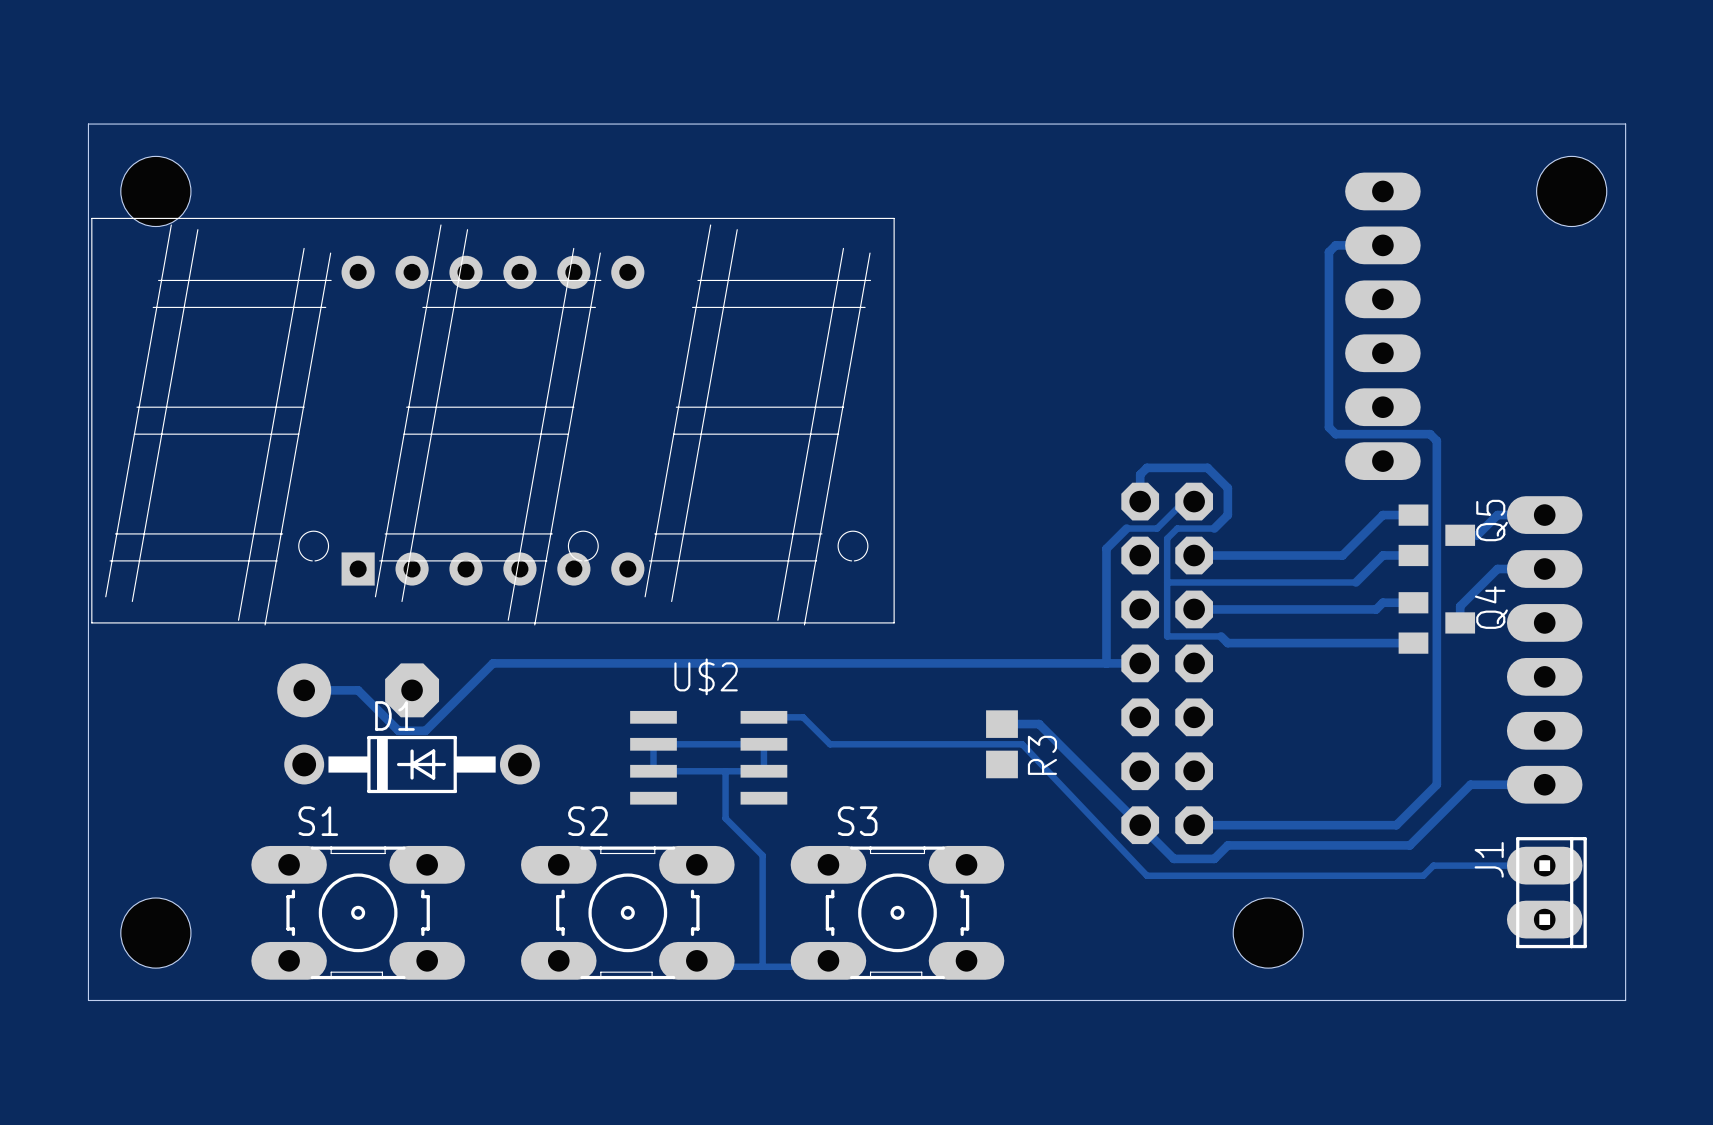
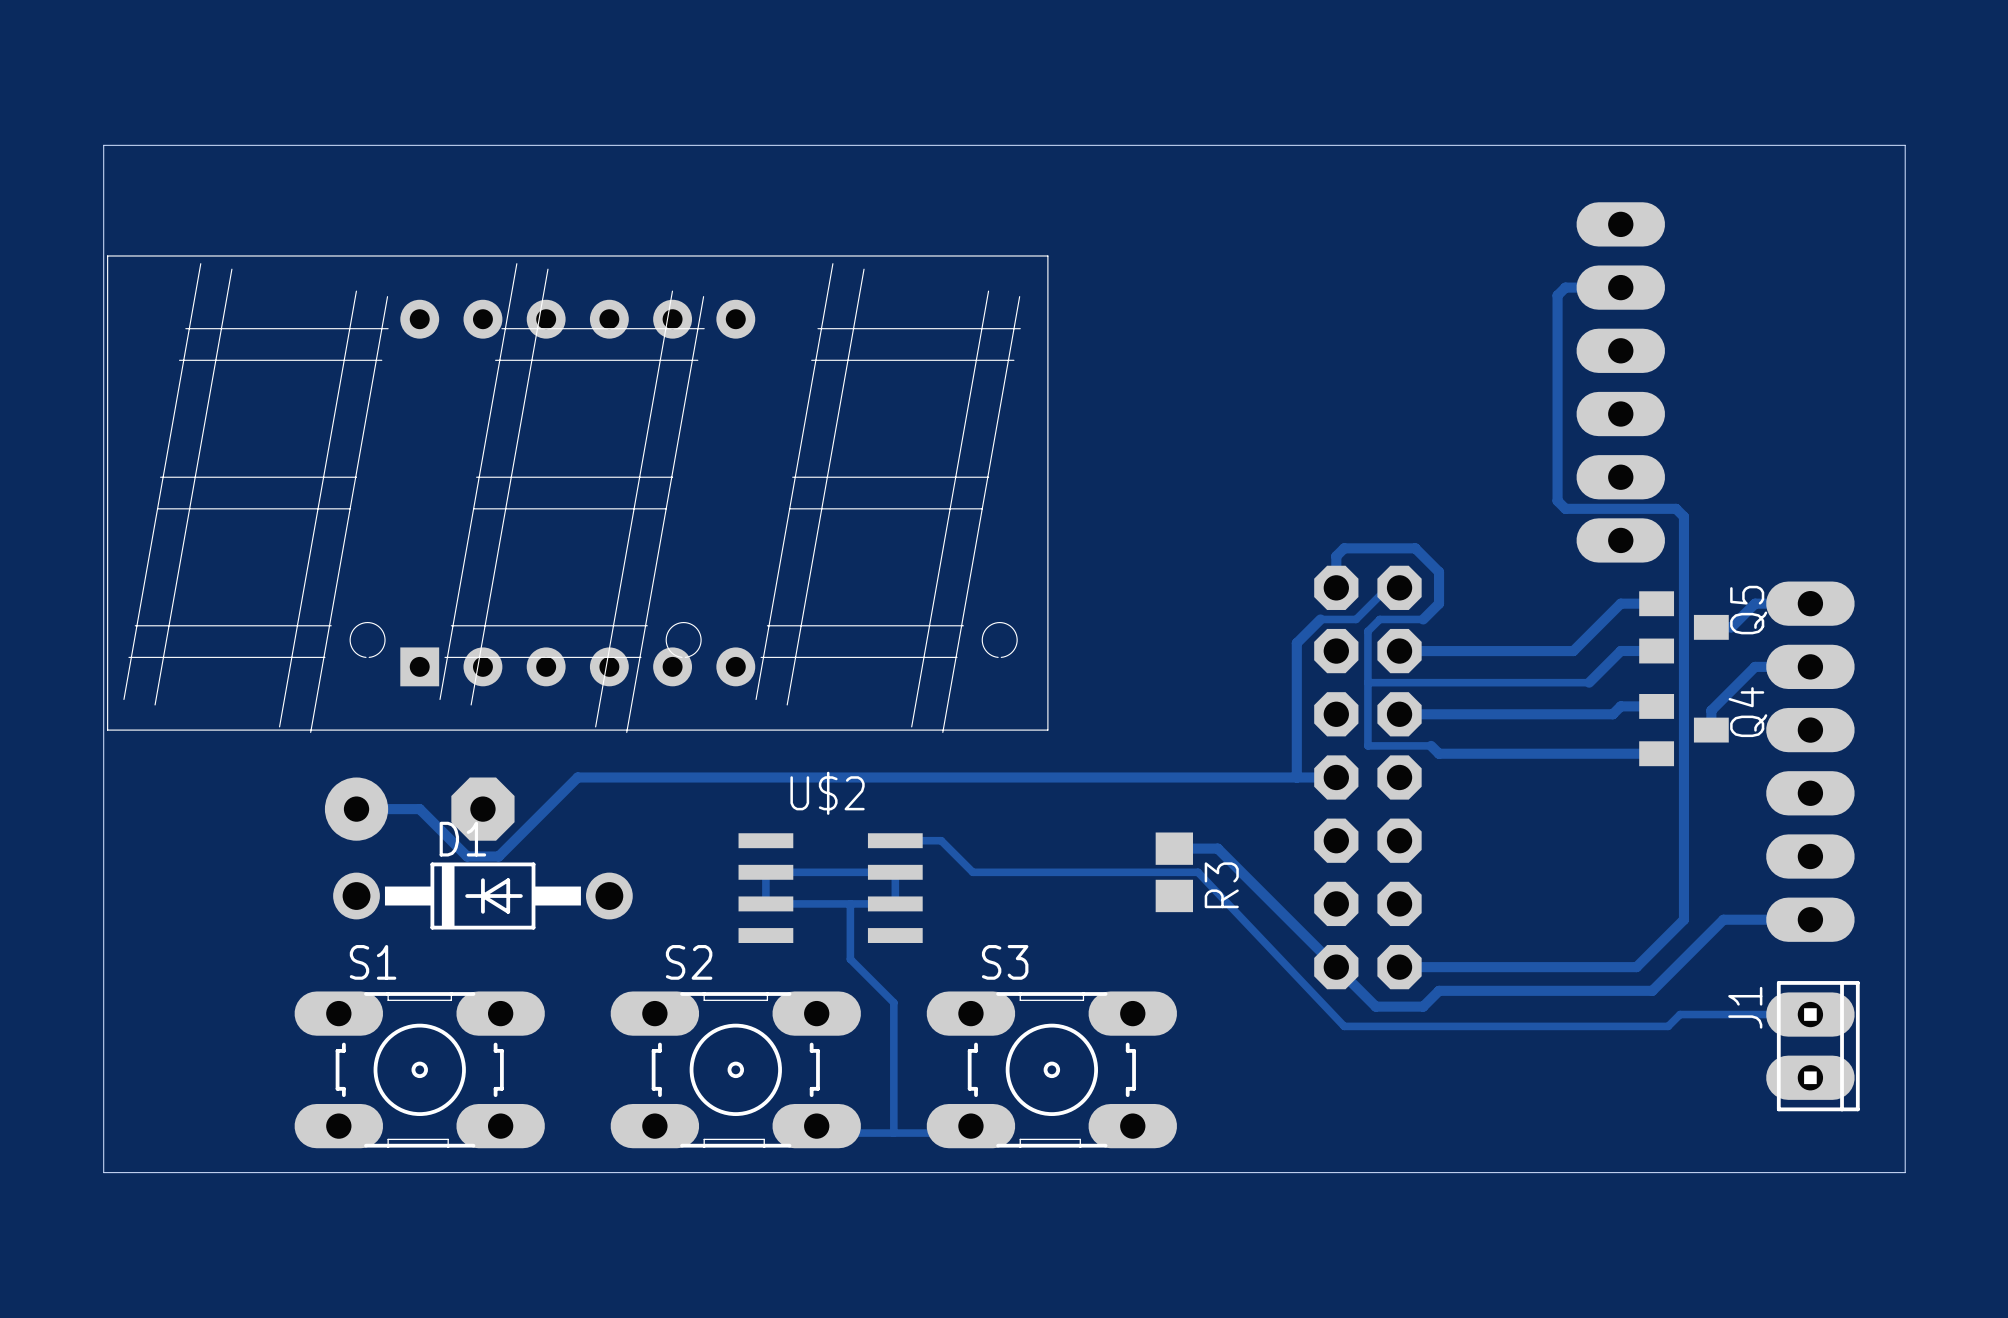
hole: (155, 191) -> none
hole: (1571, 191) -> none
hole: (155, 933) -> none
hole: (1268, 933) -> none

